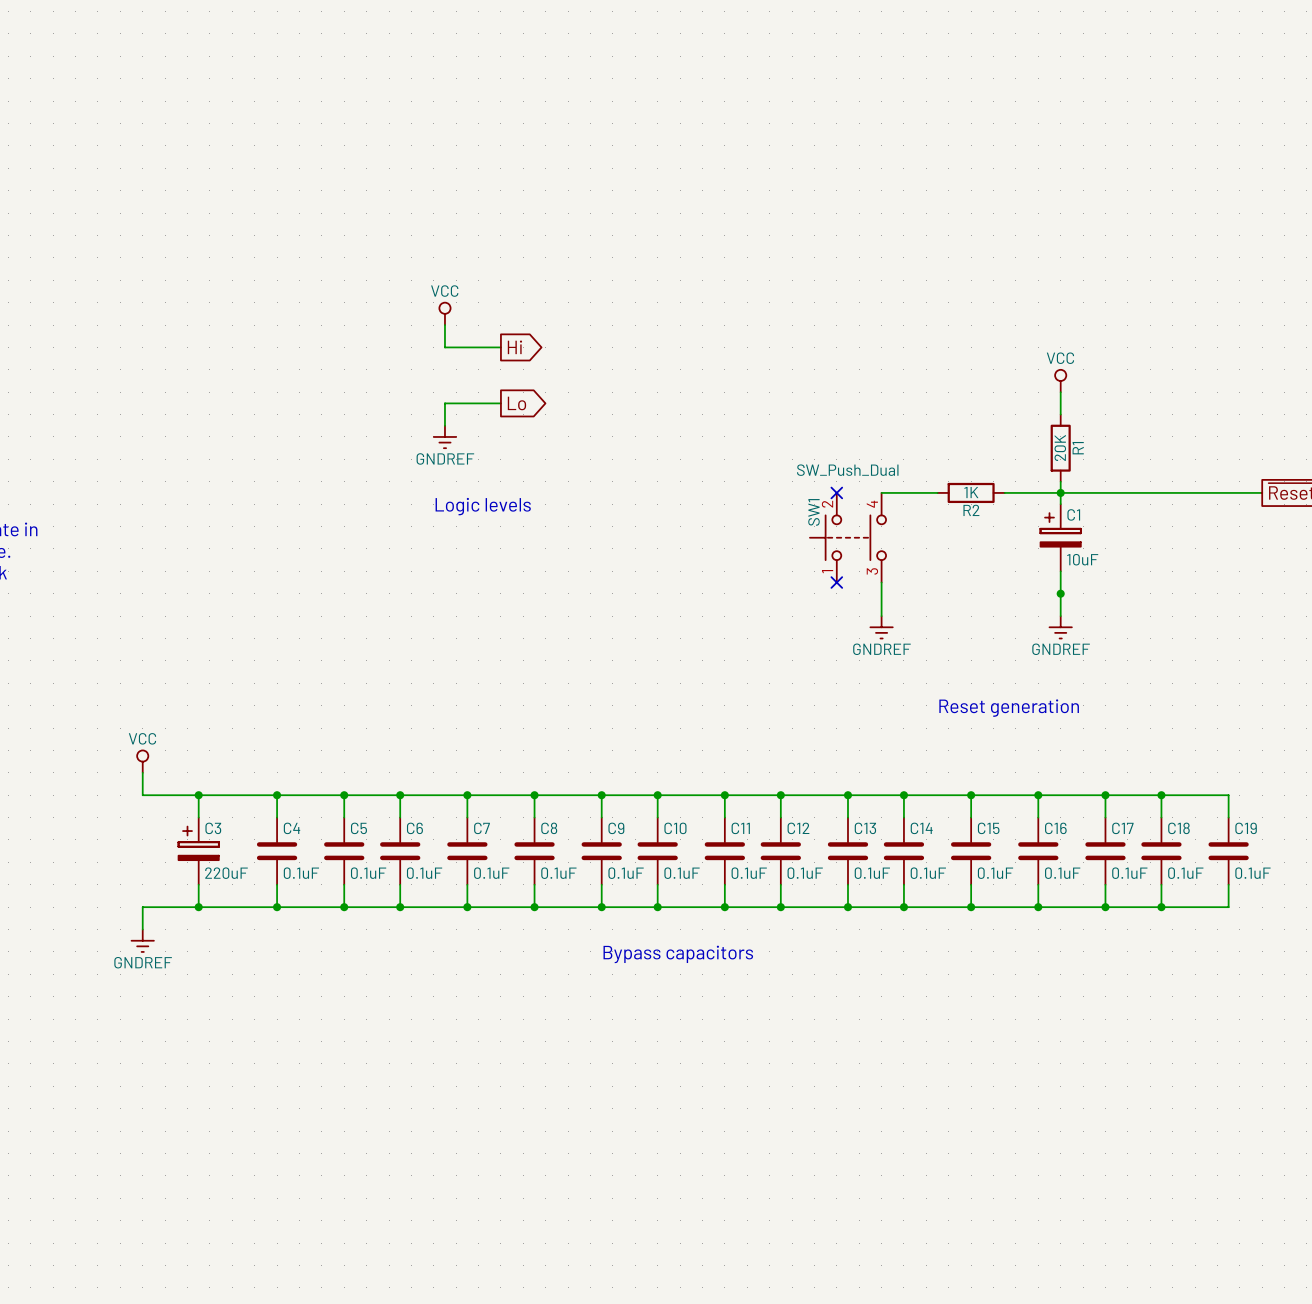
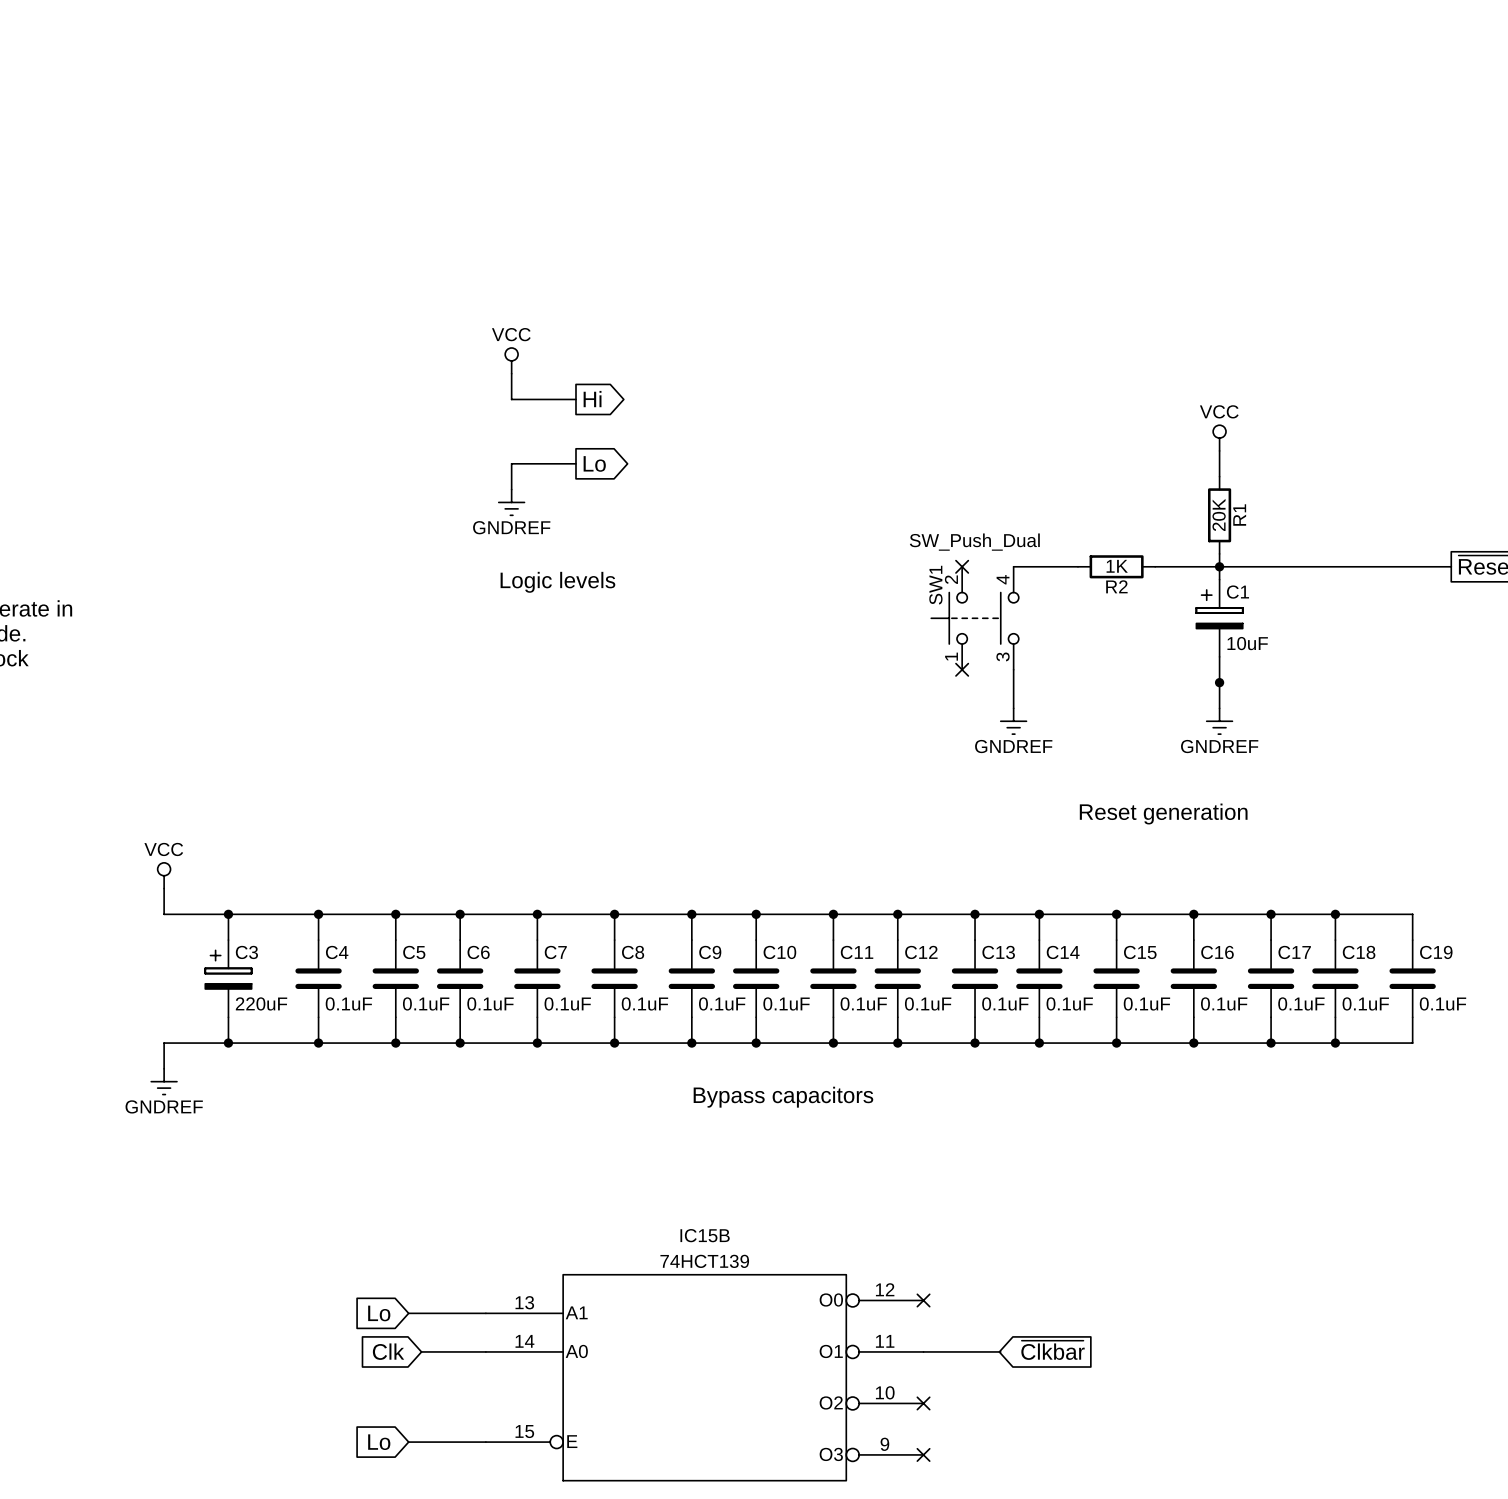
no-connect mark: none -> (923, 1300)
global label: none -> Lo (379, 1313)
wire: none -> (408, 1313) (485, 1313)
global label: none -> ~{Clkbar} (1053, 1350)
global label: none -> Clk (388, 1351)
wire: none -> (421, 1351) (485, 1351)
wire: none -> (923, 1351) (1000, 1351)
IC15B: none -> 74HCT139 (704, 1377)
no-connect mark: none -> (923, 1403)
global label: none -> Lo (379, 1442)
wire: none -> (408, 1442) (485, 1442)
no-connect mark: none -> (923, 1454)

